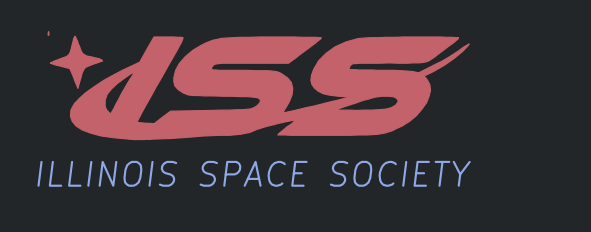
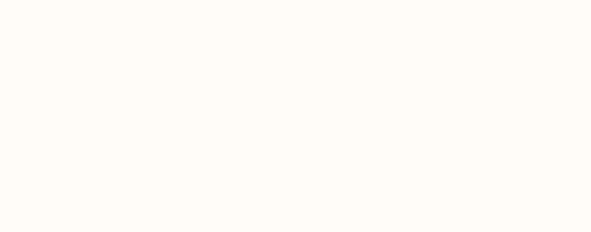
power symbol: (258, 85) -> none
text: ILLINOIS SPACE SOCIETY (254, 173) -> none

